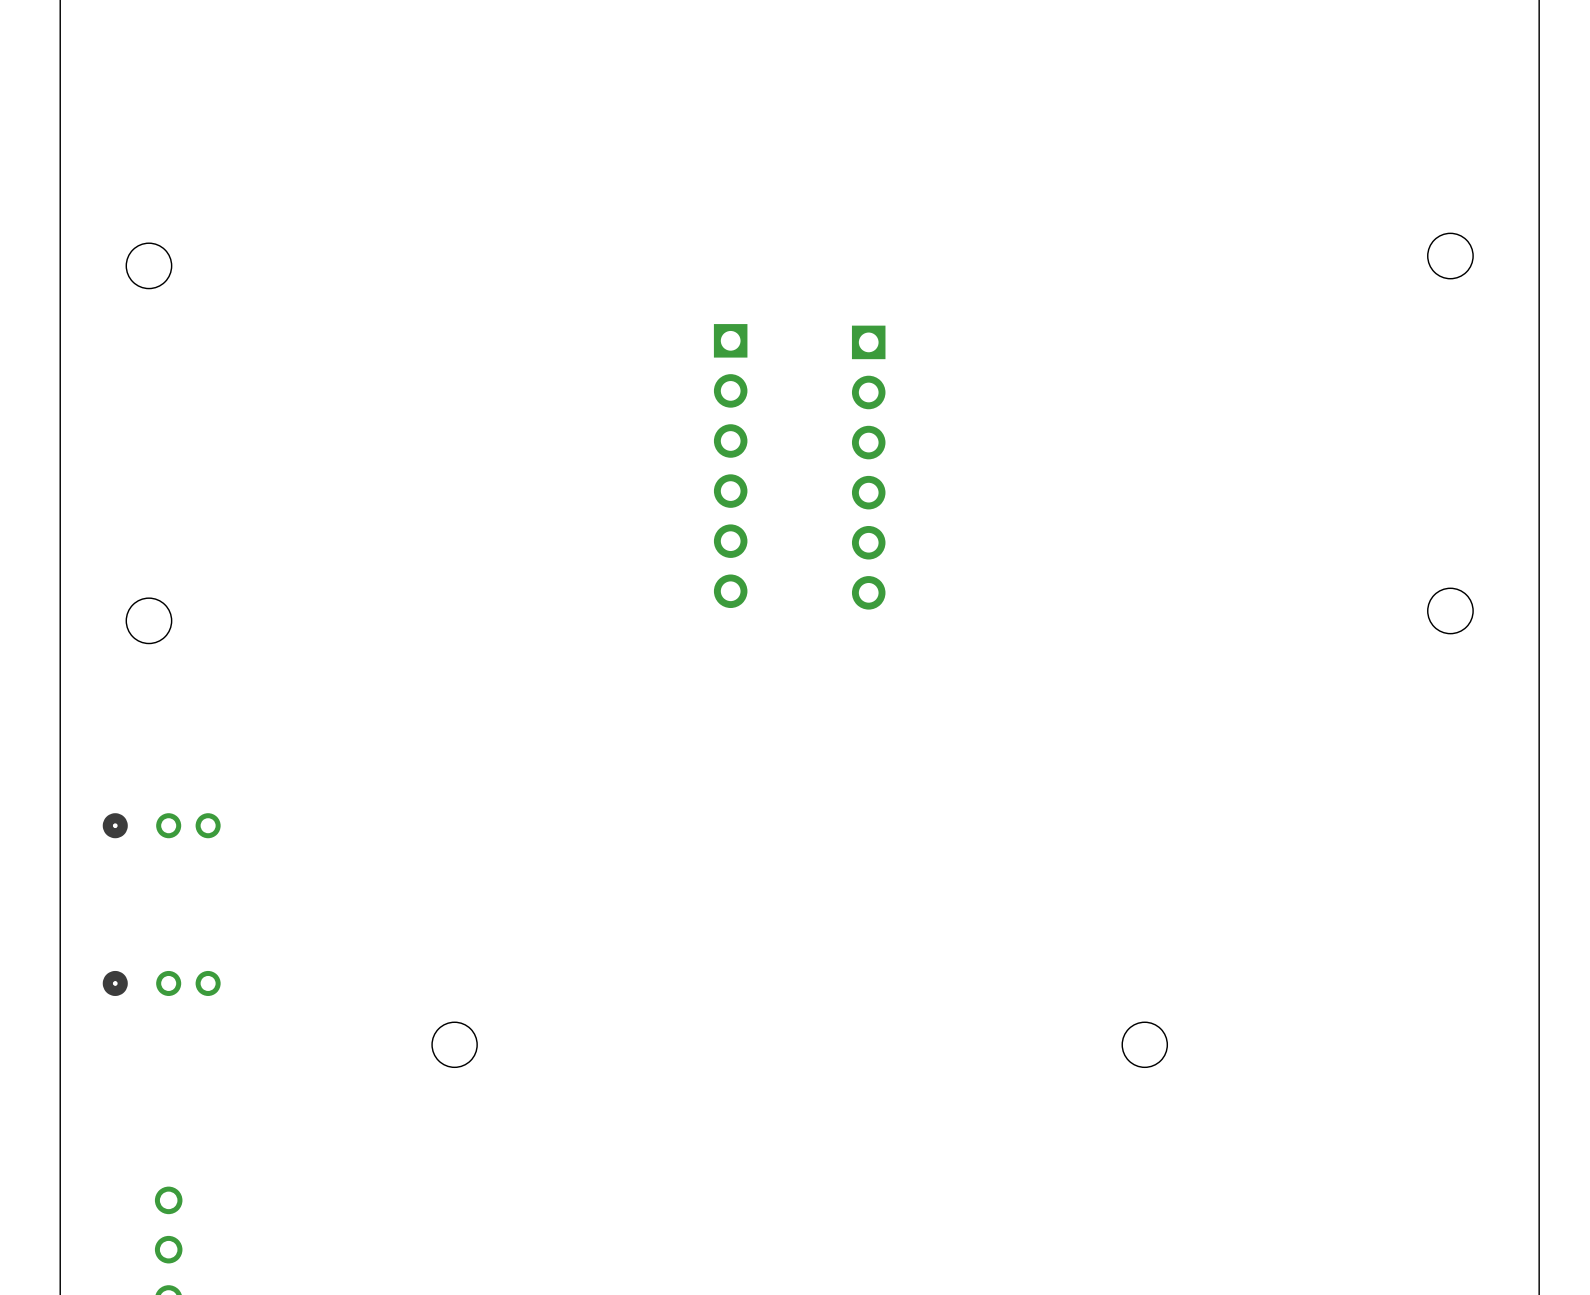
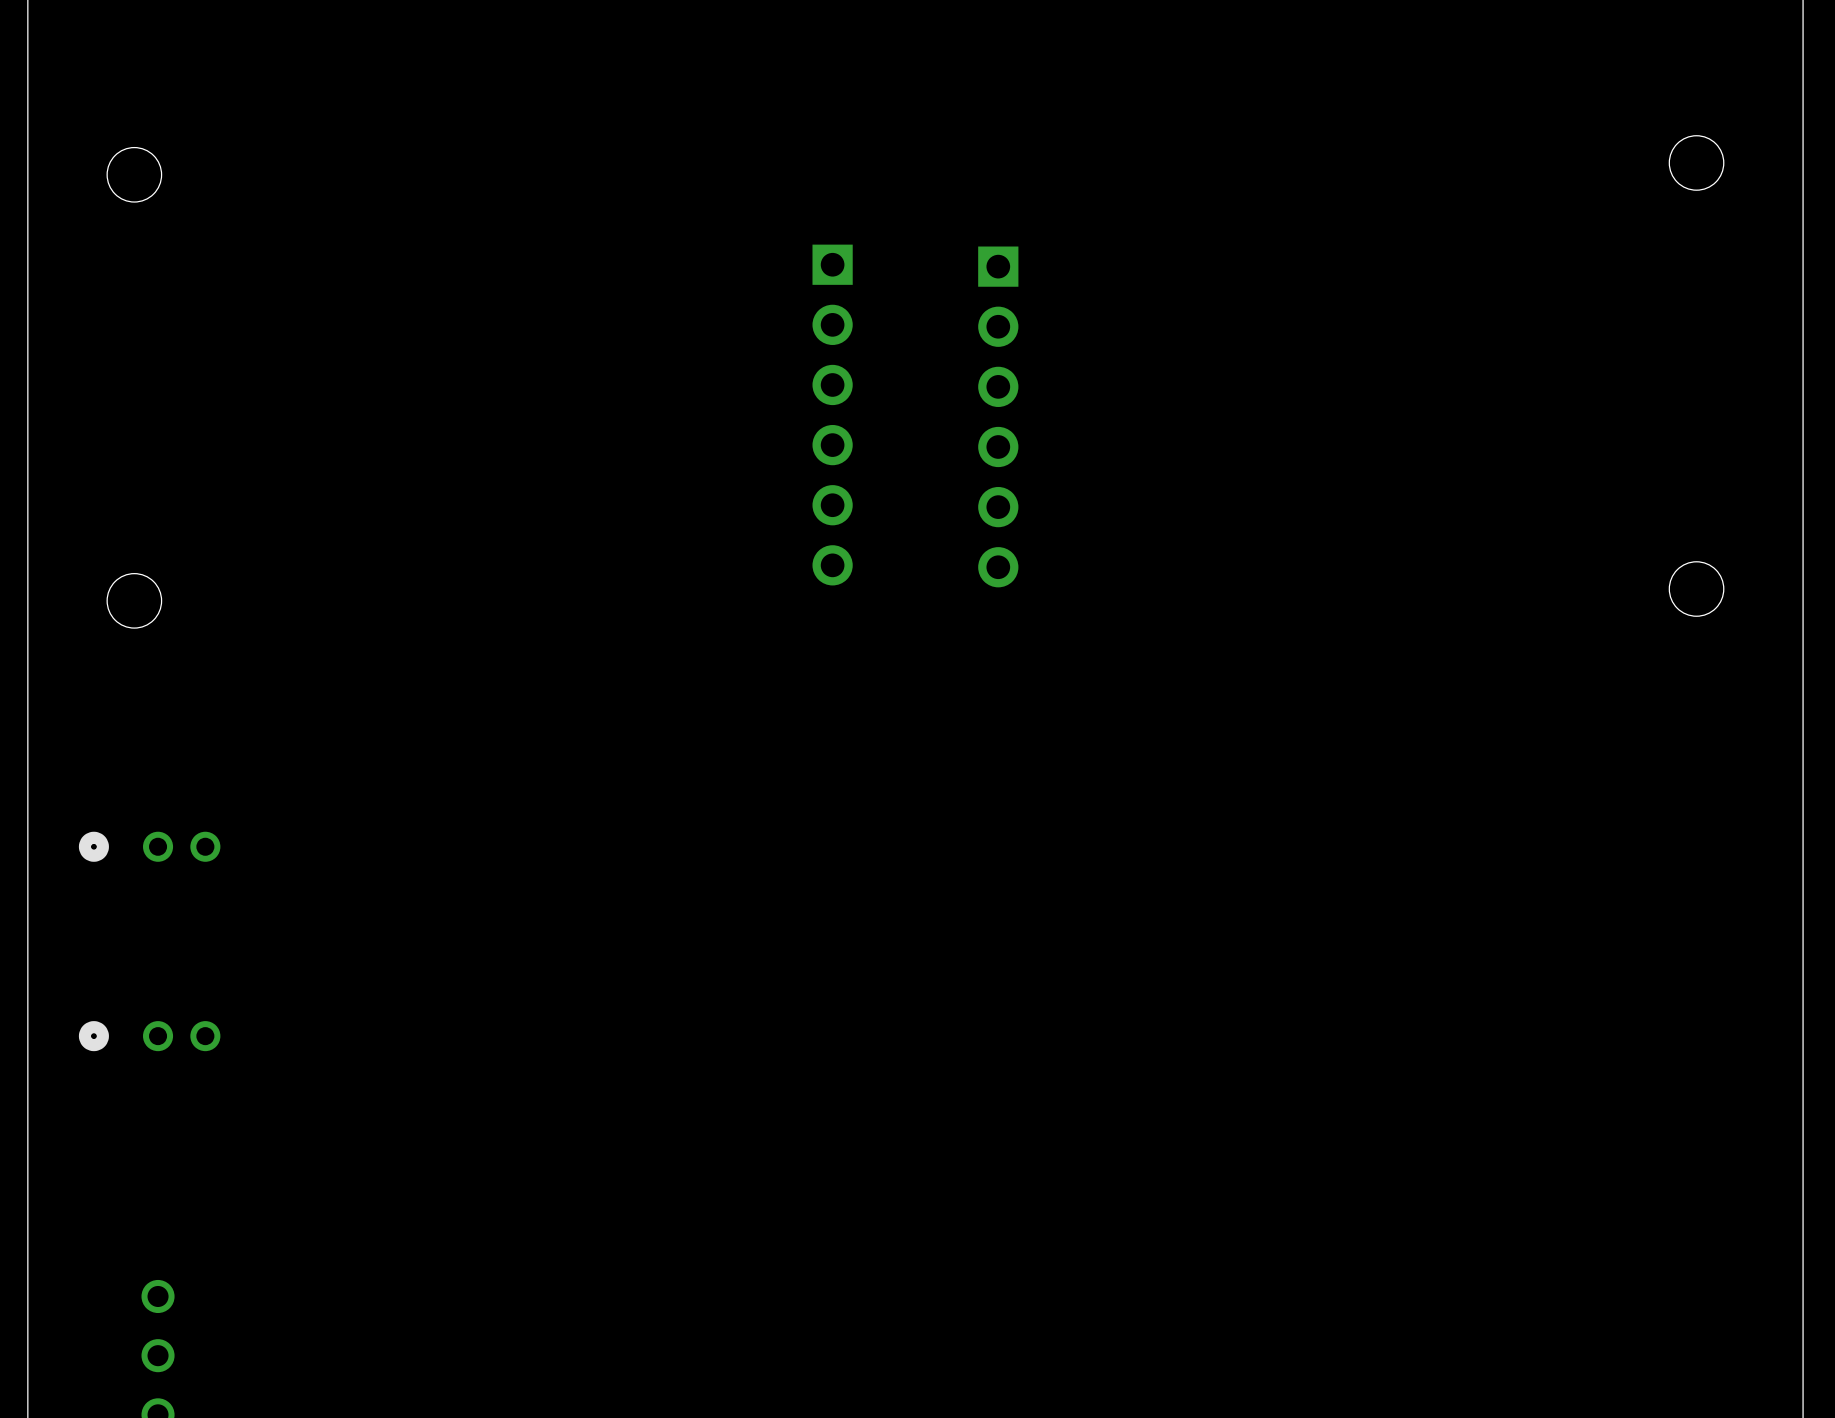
round board edge: [431, 1021, 478, 1068] -> none
round board edge: [1121, 1021, 1168, 1068] -> none

